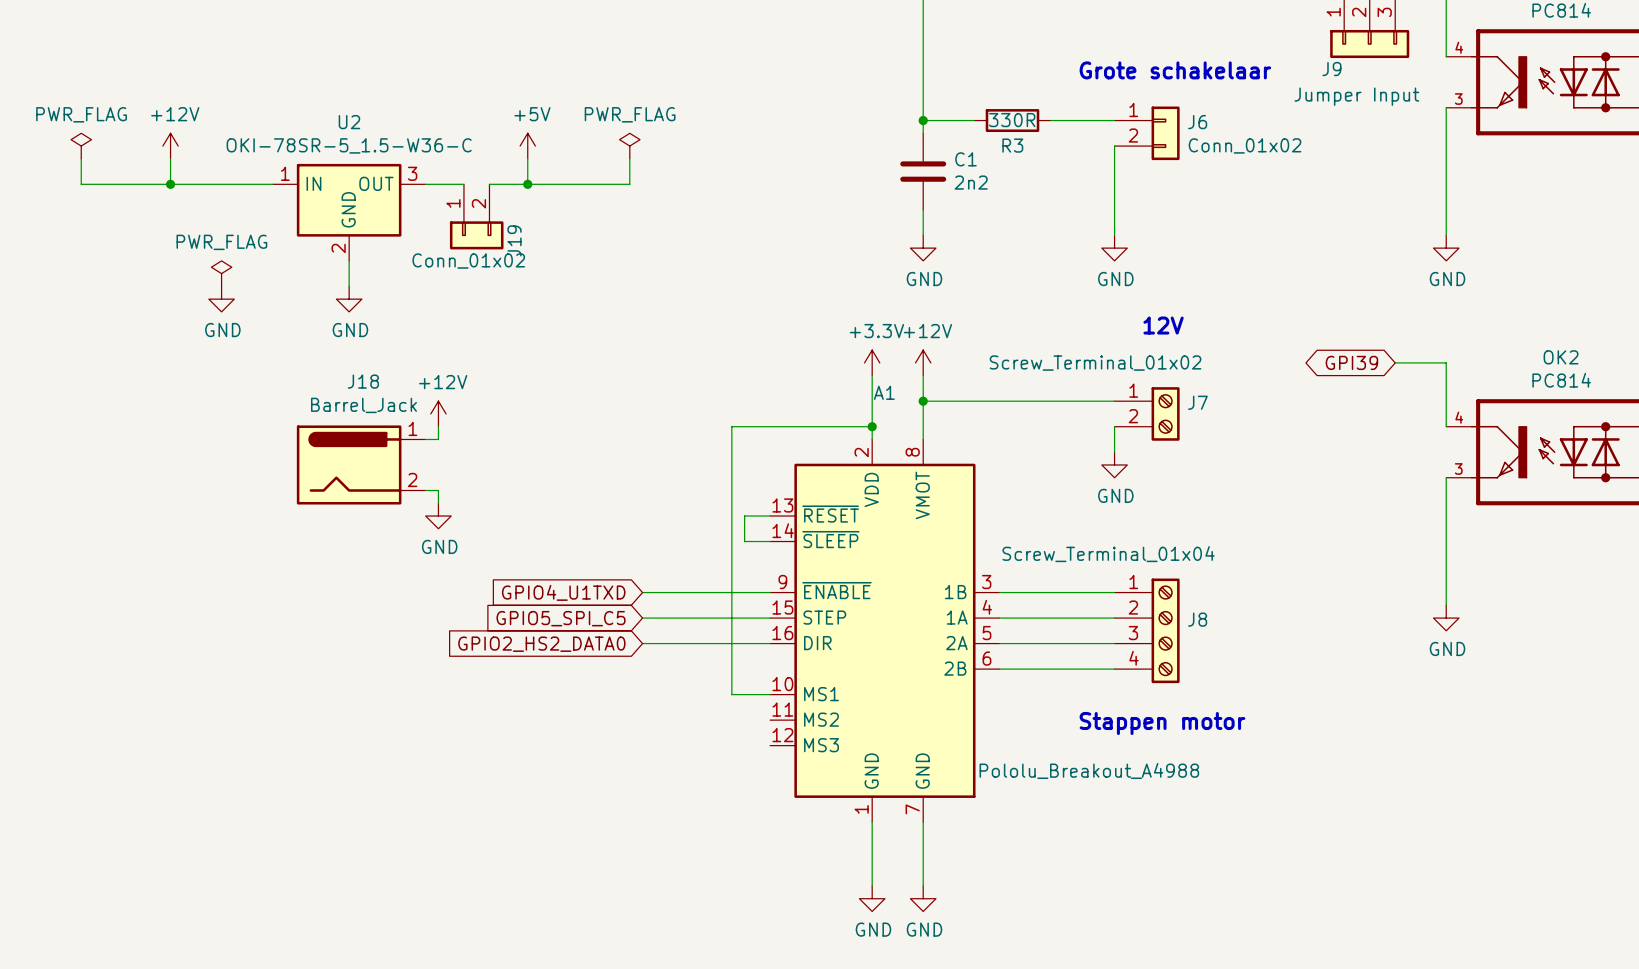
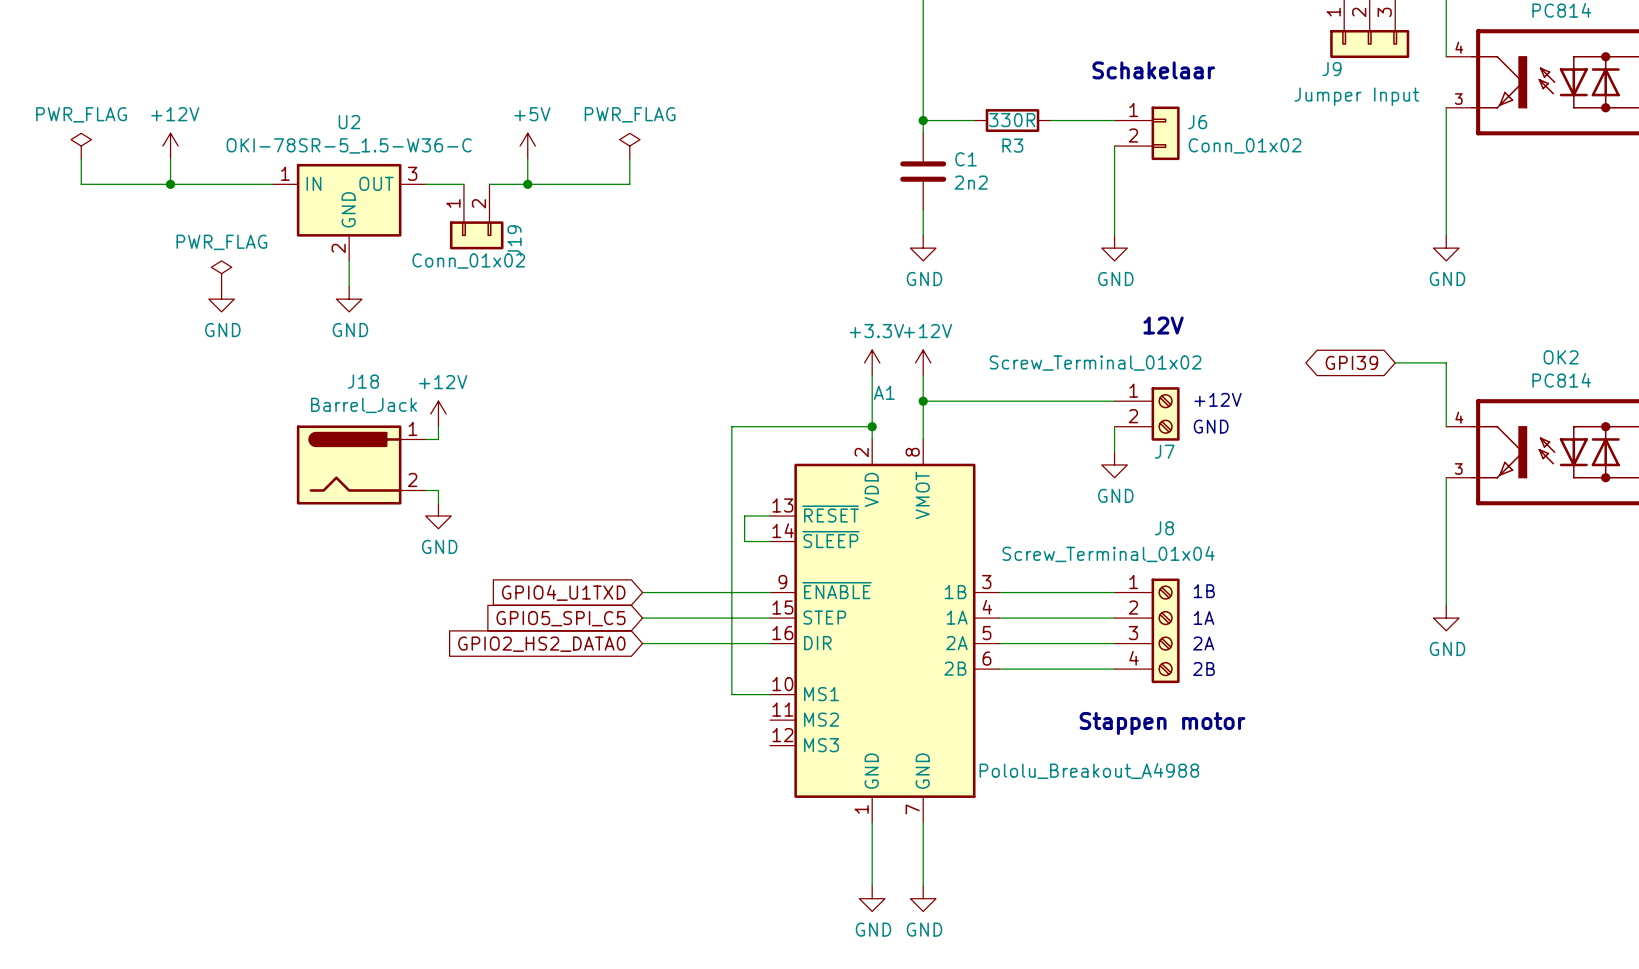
text: Grote schakelaar (1175, 70) -> Schakelaar (1153, 70)
text: none -> +12V (1218, 399)
J7 name position: J7 (1197, 402) -> J7 (1164, 451)
text: none -> GND (1211, 426)
text: none -> 1B (1204, 591)
text: none -> 1A (1204, 617)
J8 name position: J8 (1197, 619) -> J8 (1164, 528)
text: none -> 2A (1203, 643)
text: none -> 2B (1204, 669)

